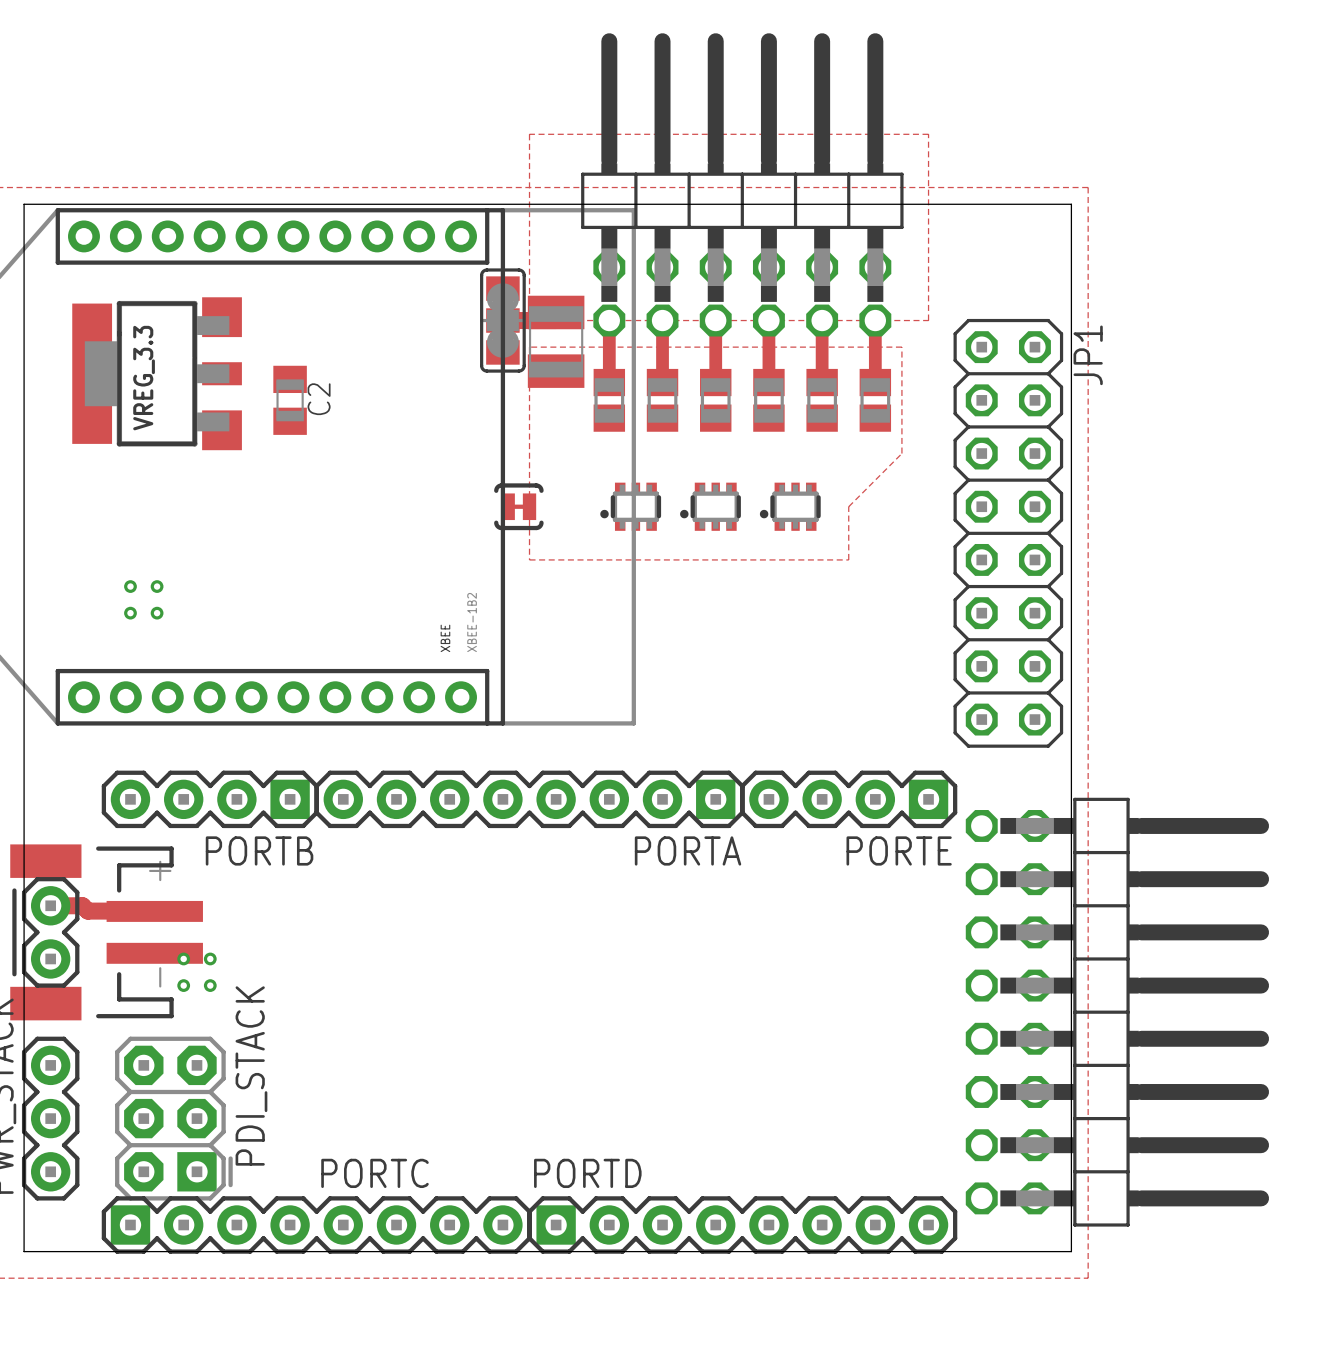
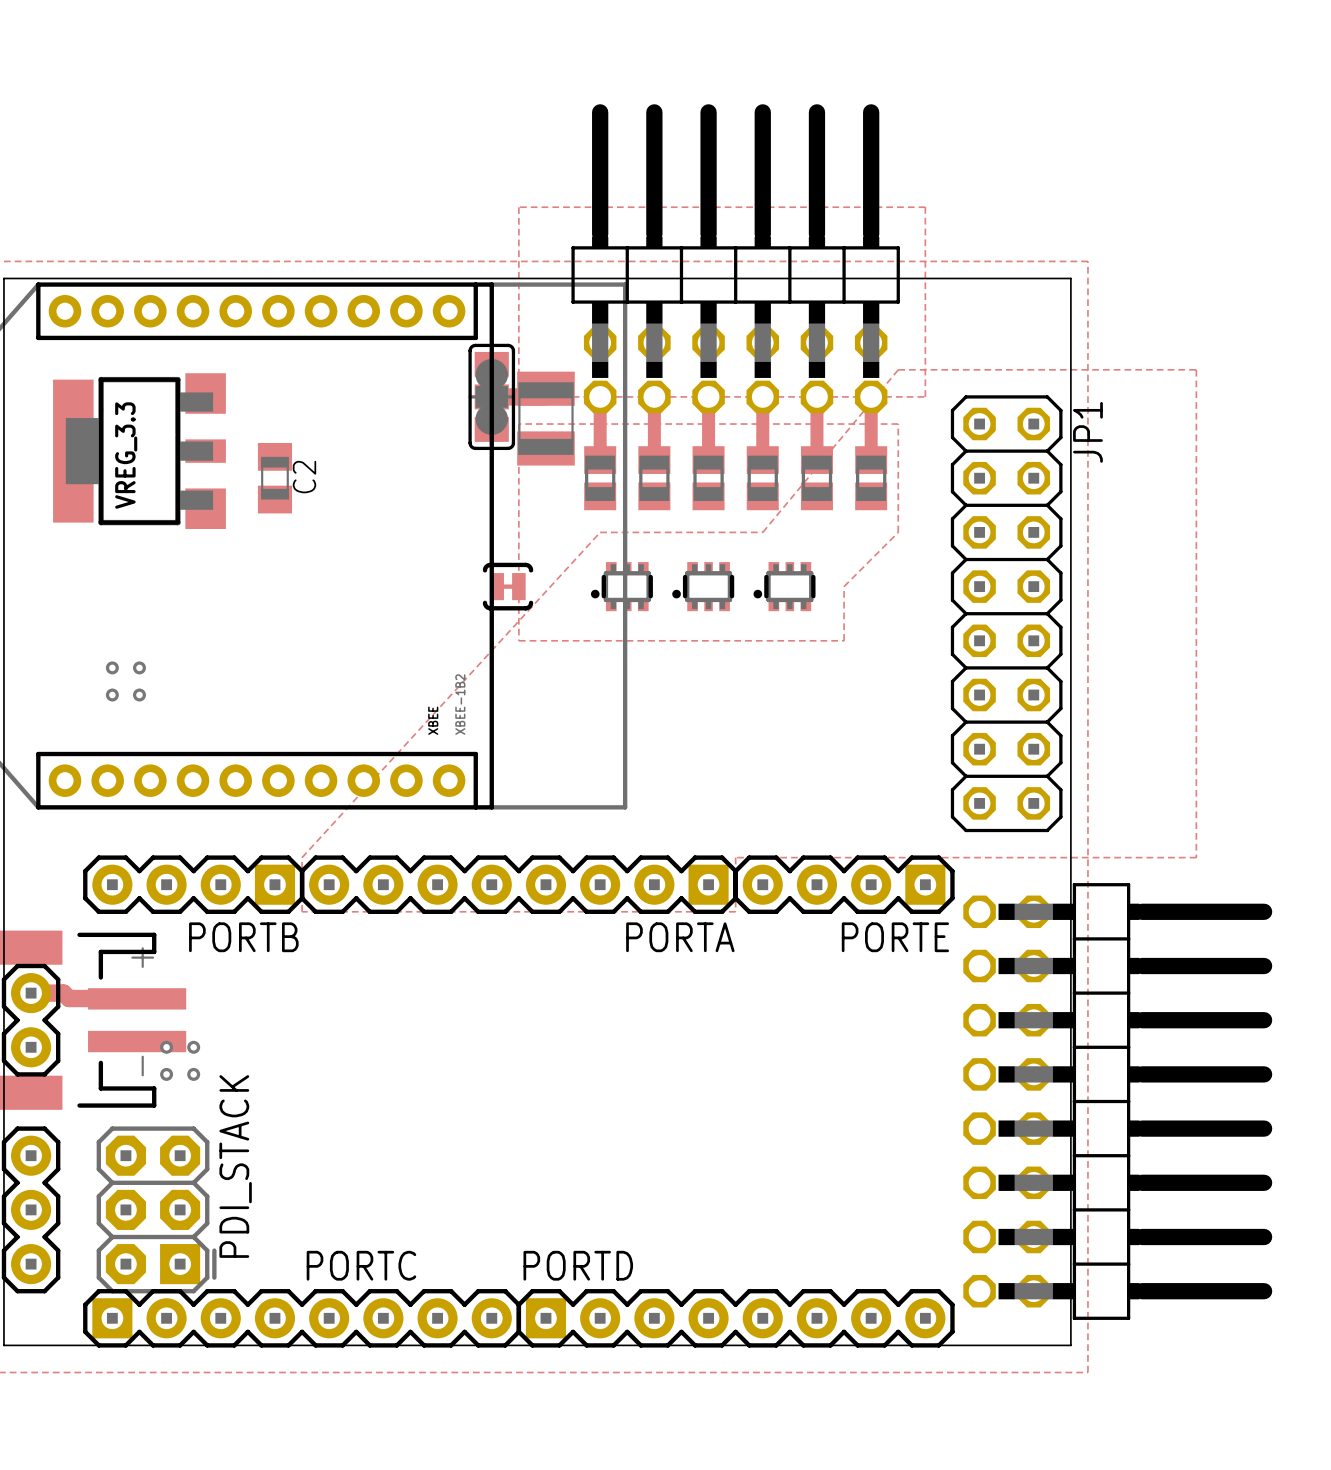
zone outline: none -> (898, 369) (762, 532) (600, 532) (302, 857) (302, 911) (735, 911) (735, 857) (1196, 857) (1196, 369) (898, 369)

